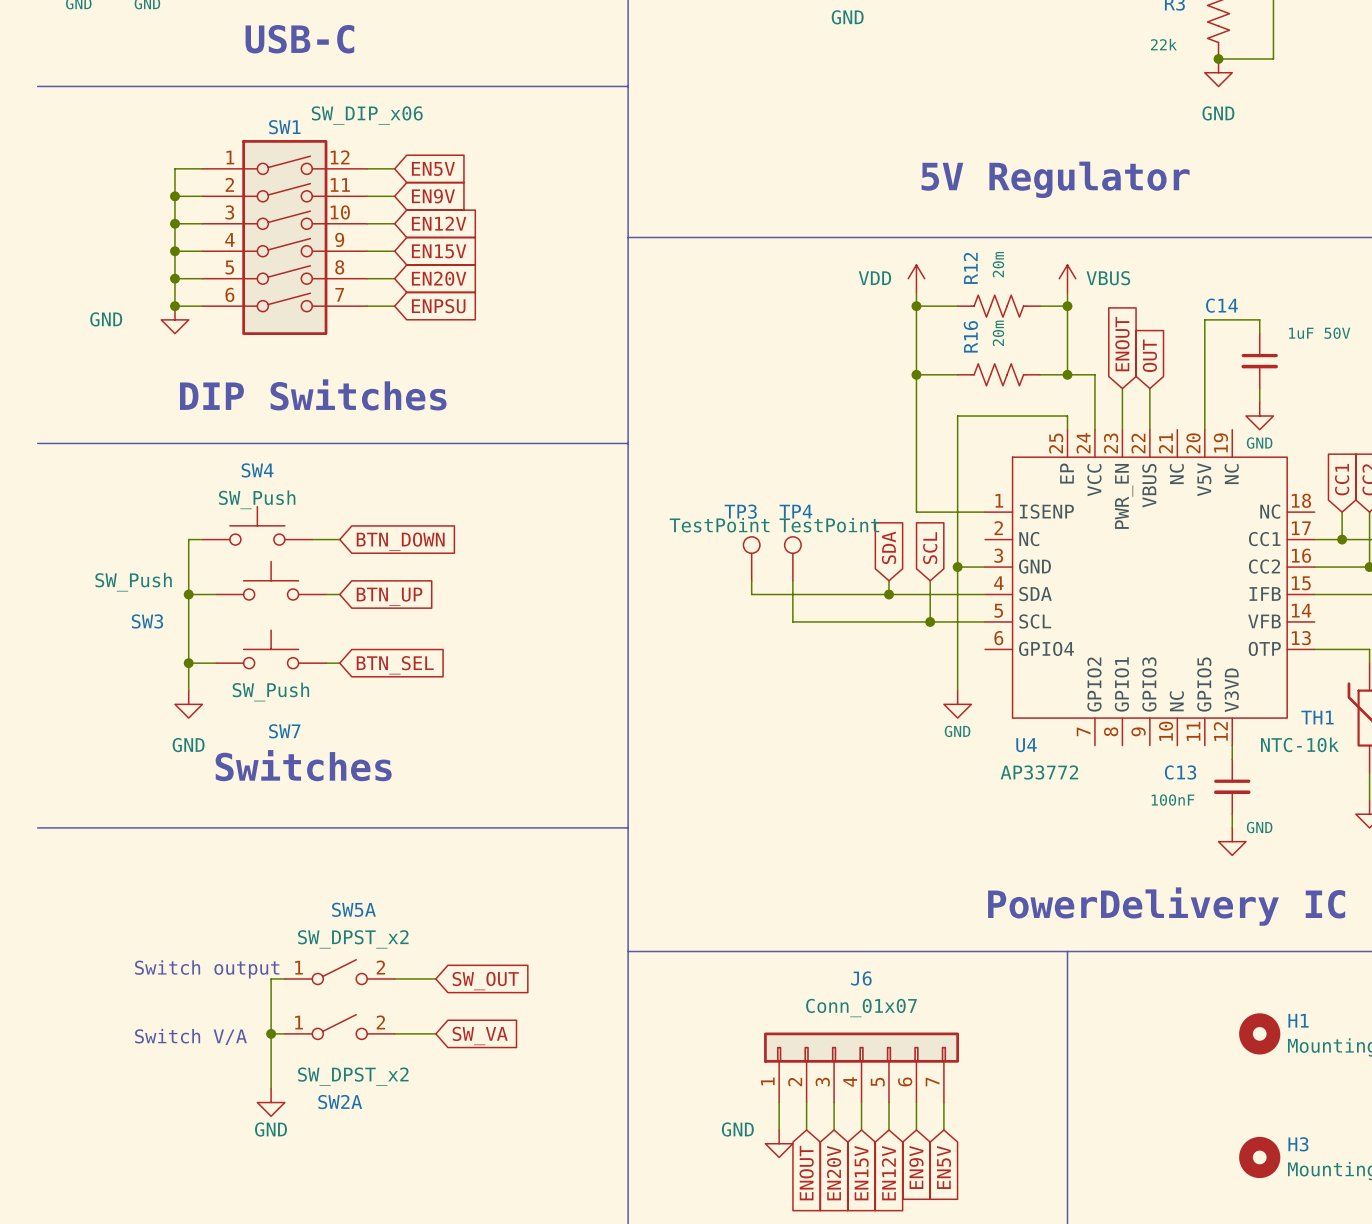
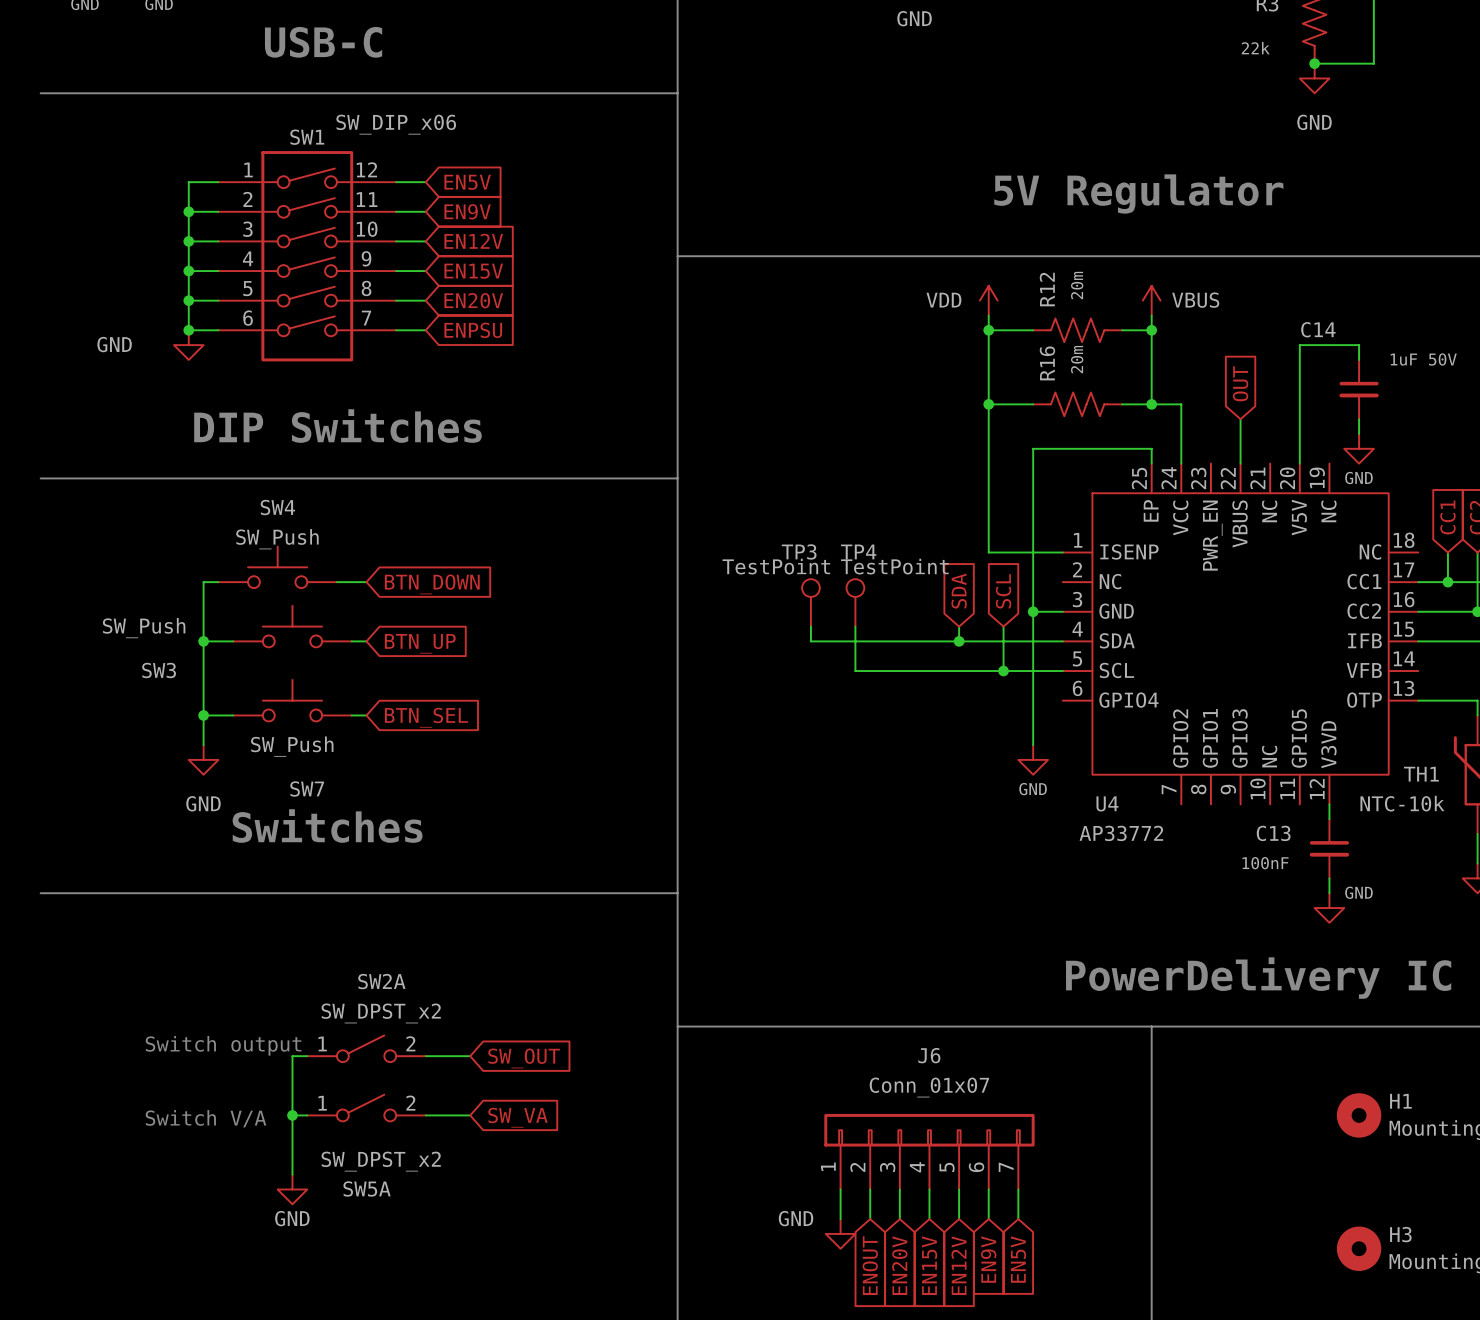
global label: ENOUT (1122, 344) -> none
wire: (1122, 388) (1122, 429) -> none
SW5A name: SW5A (353, 909) -> SW2A (381, 981)
SW2A name: SW2A (340, 1102) -> SW5A (367, 1188)

